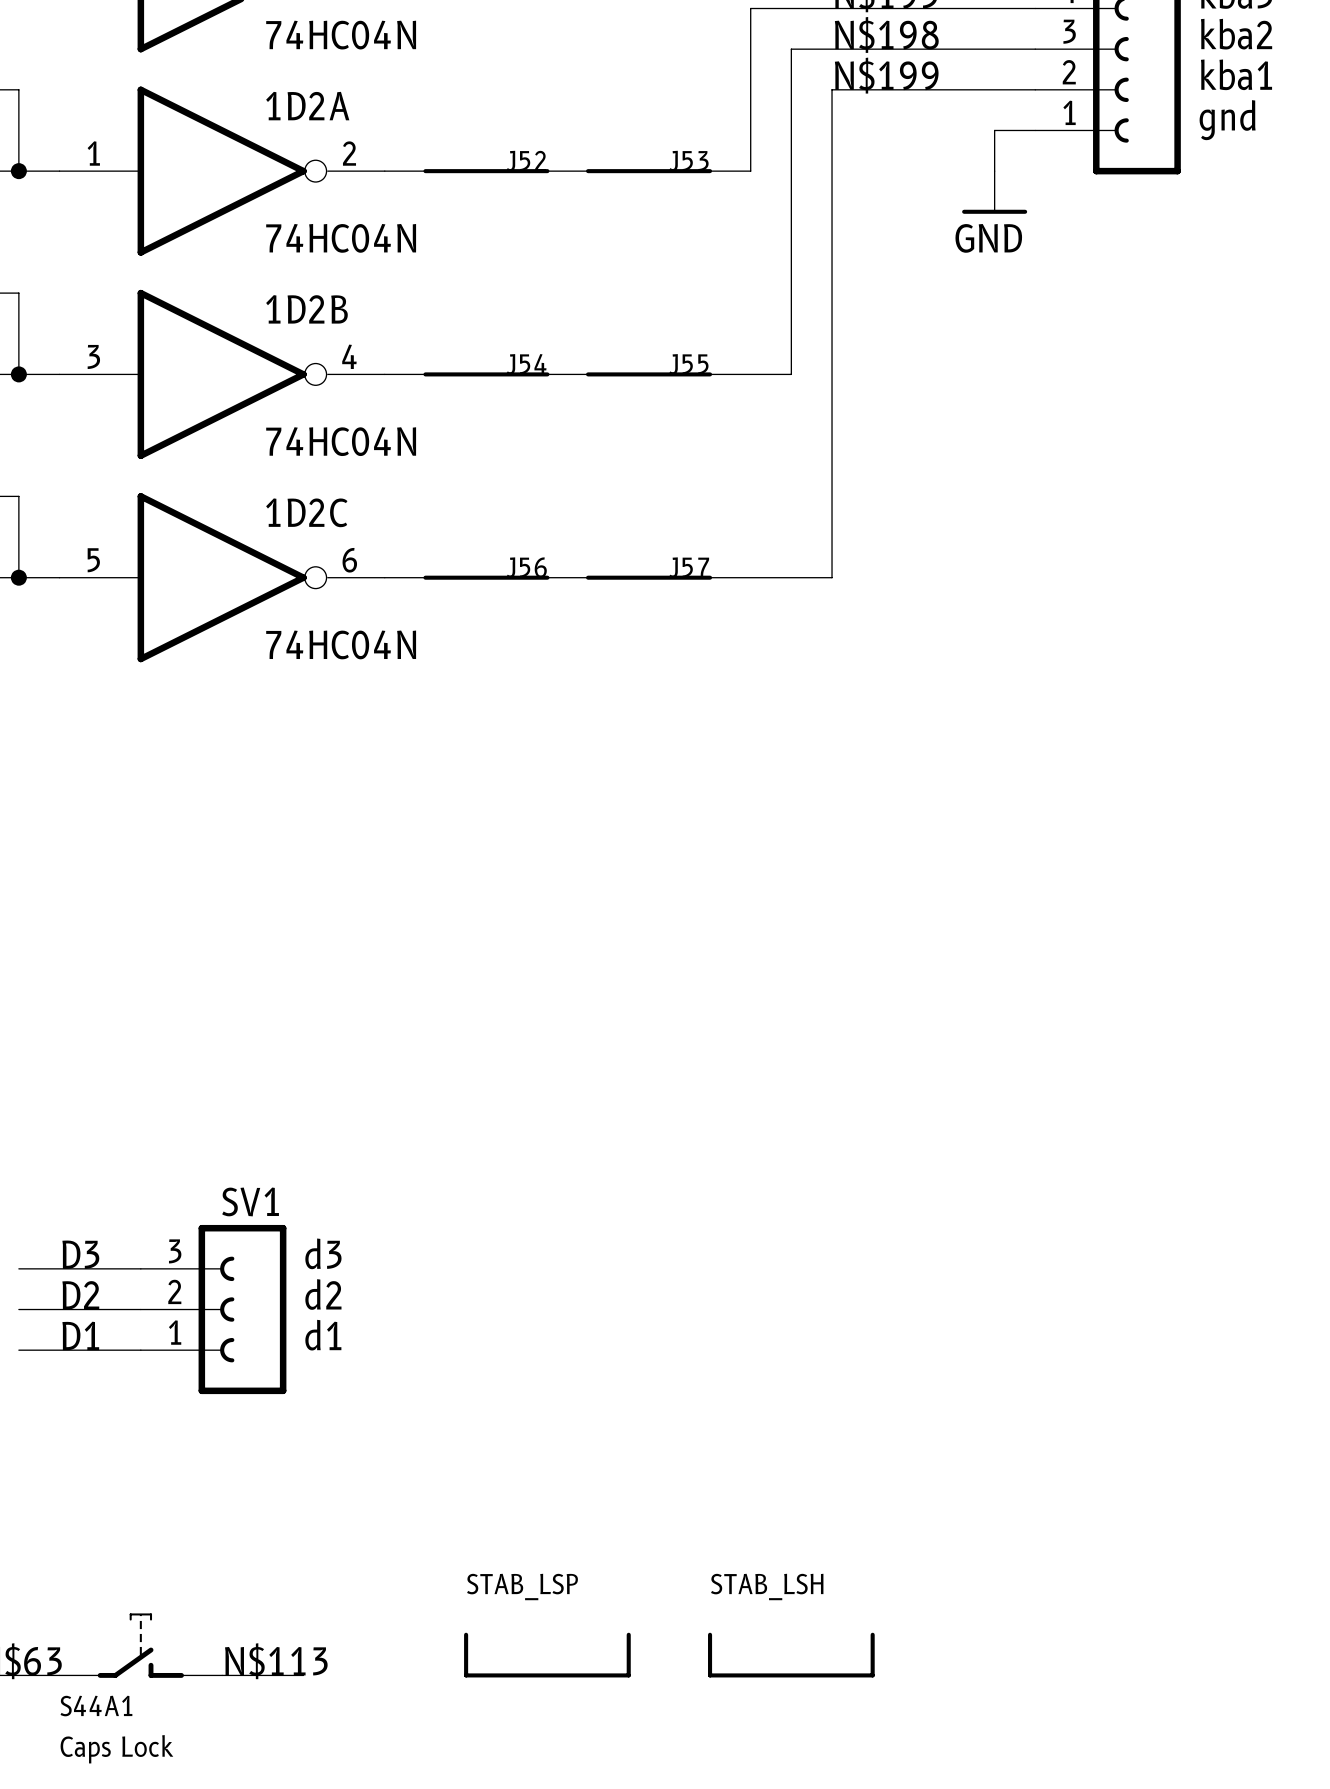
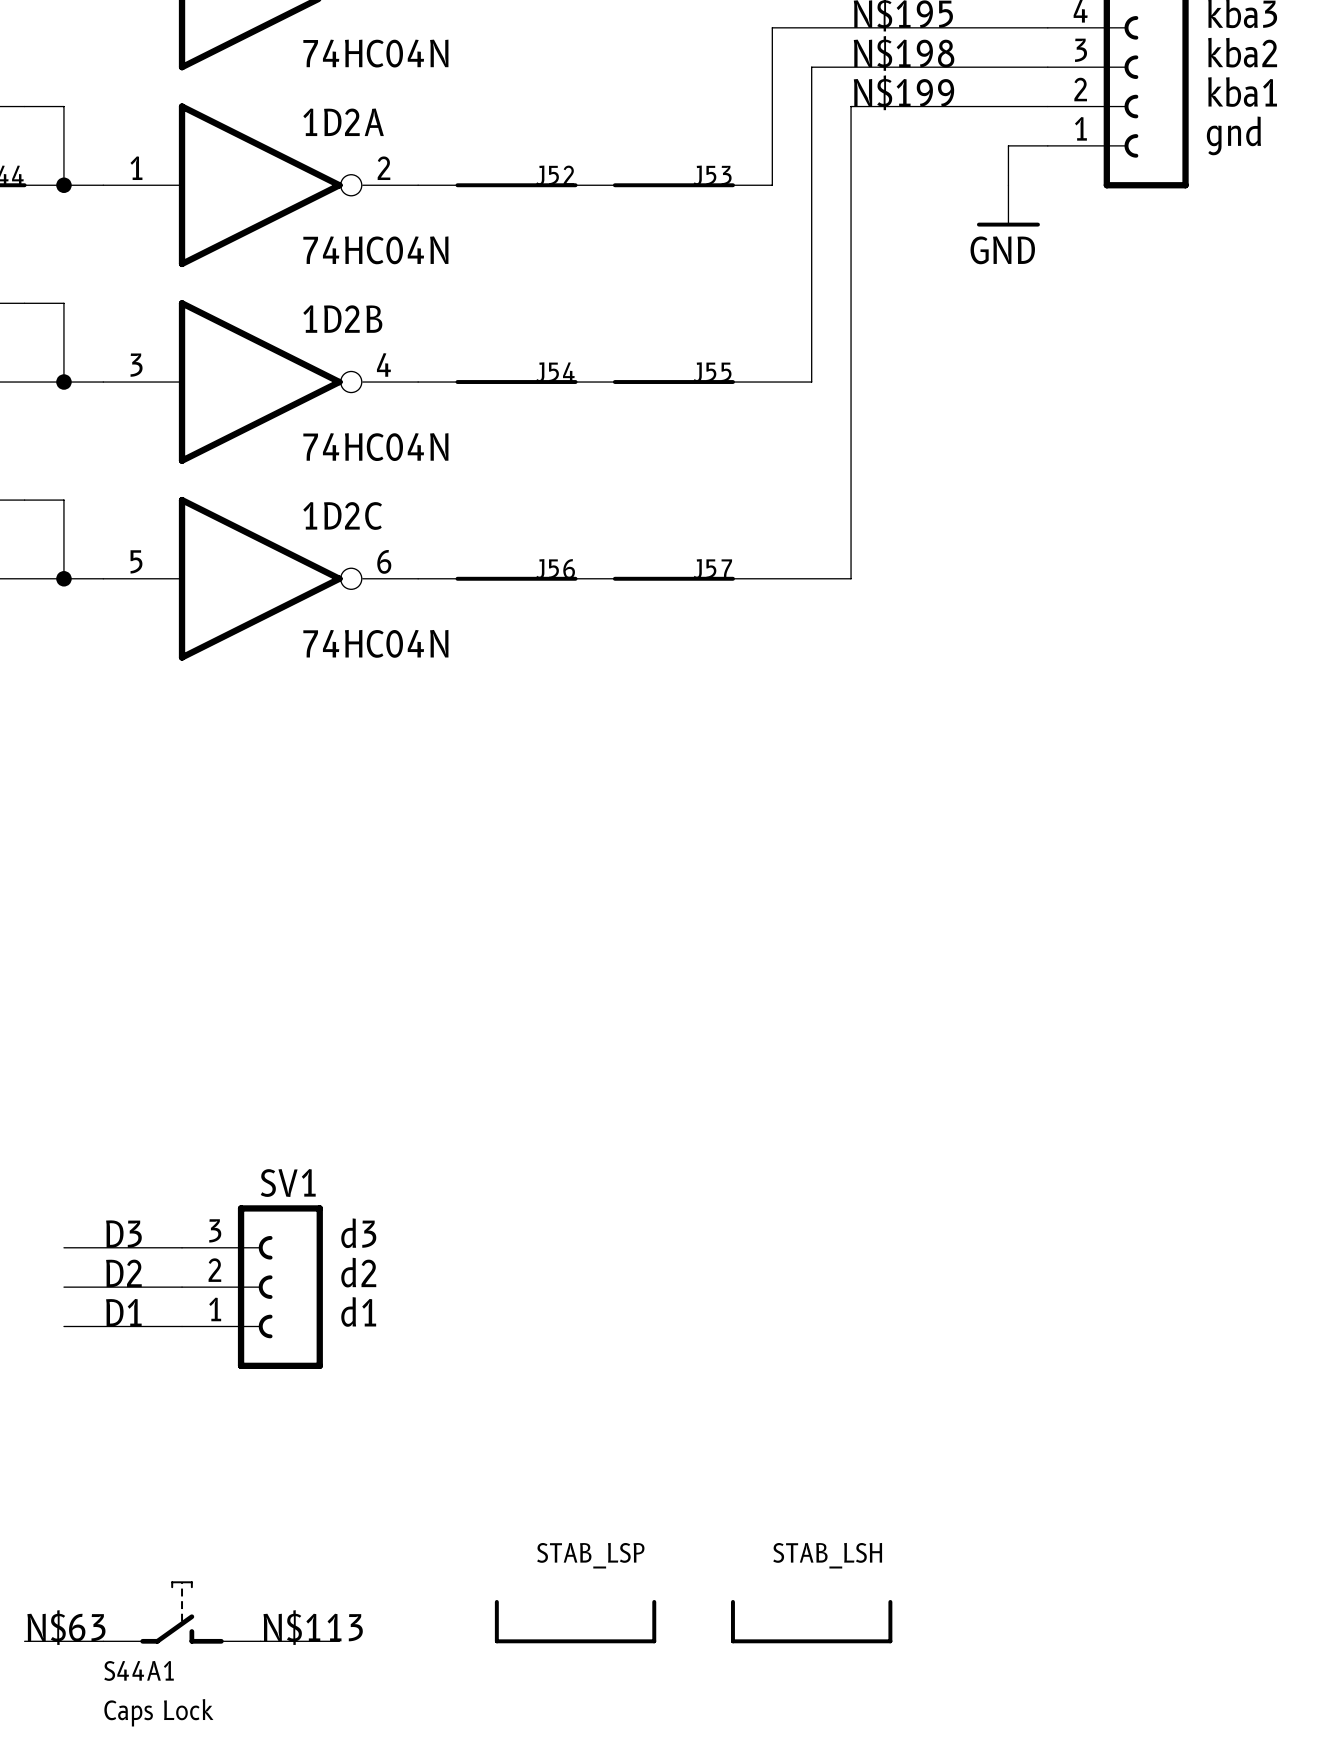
STAB_LSP name position: STAB_LSP (522, 1586) -> STAB_LSP (590, 1555)
STAB_LSH name position: STAB_LSH (767, 1586) -> STAB_LSH (827, 1555)

